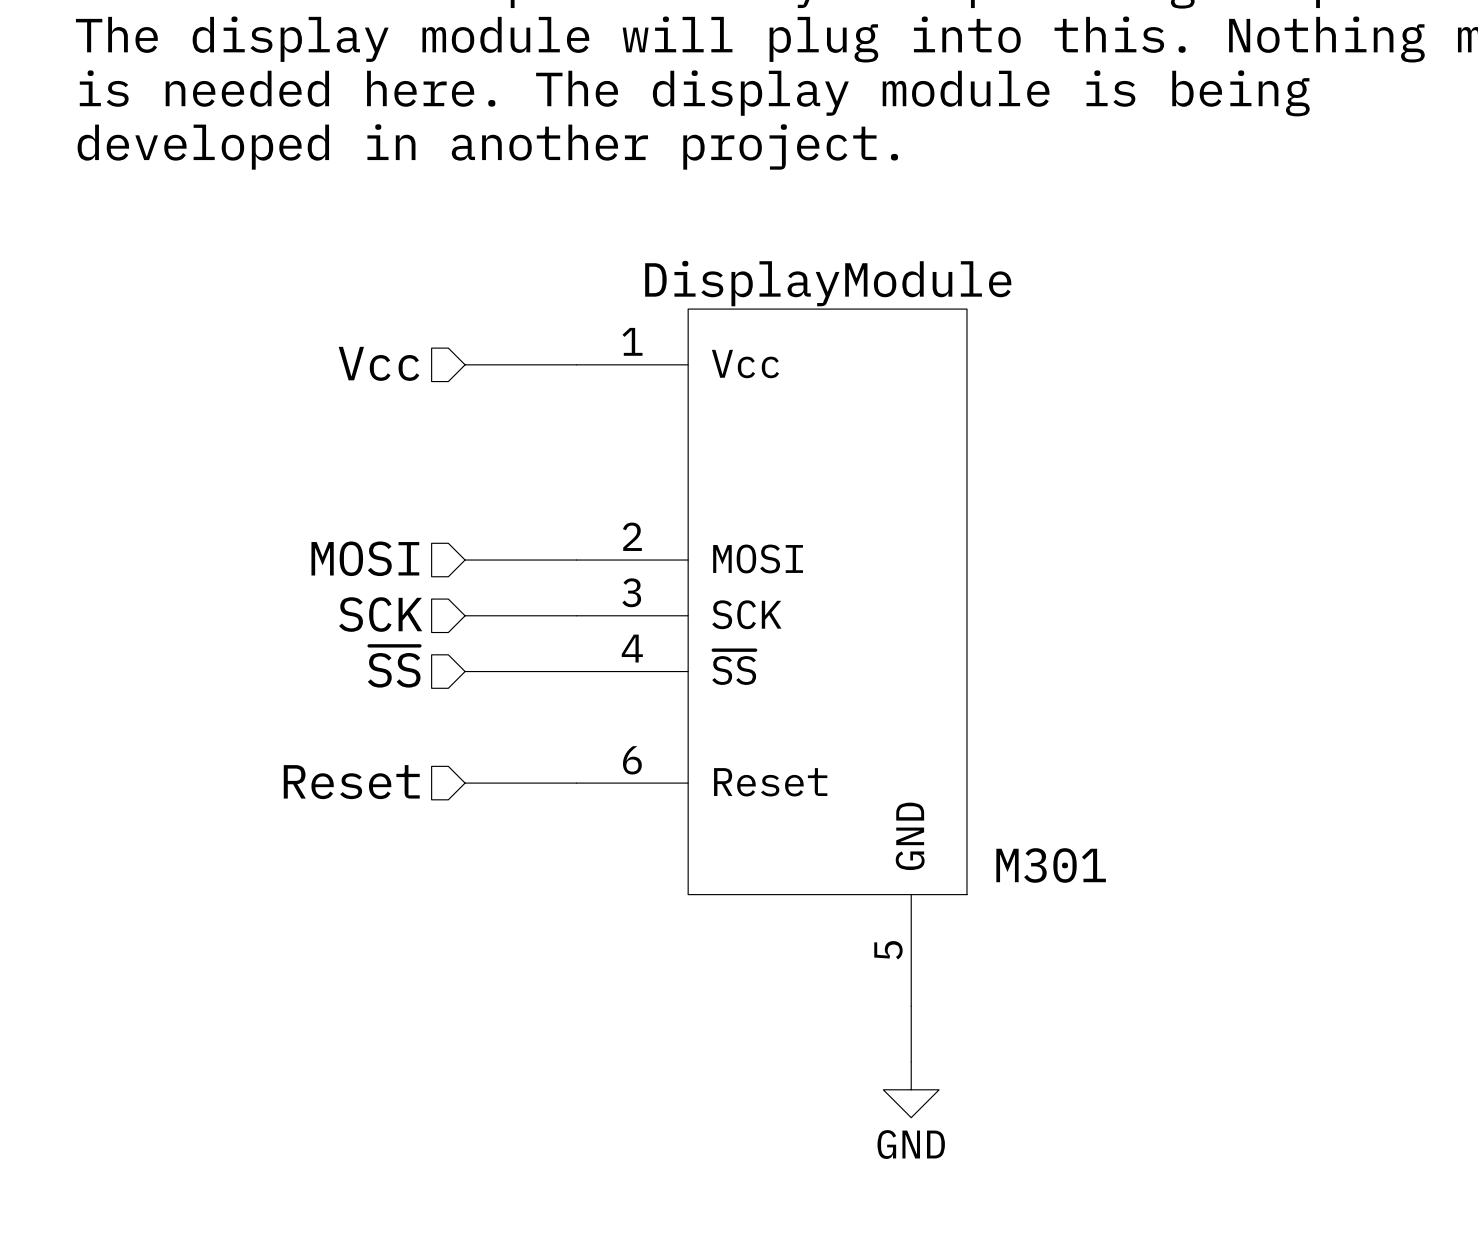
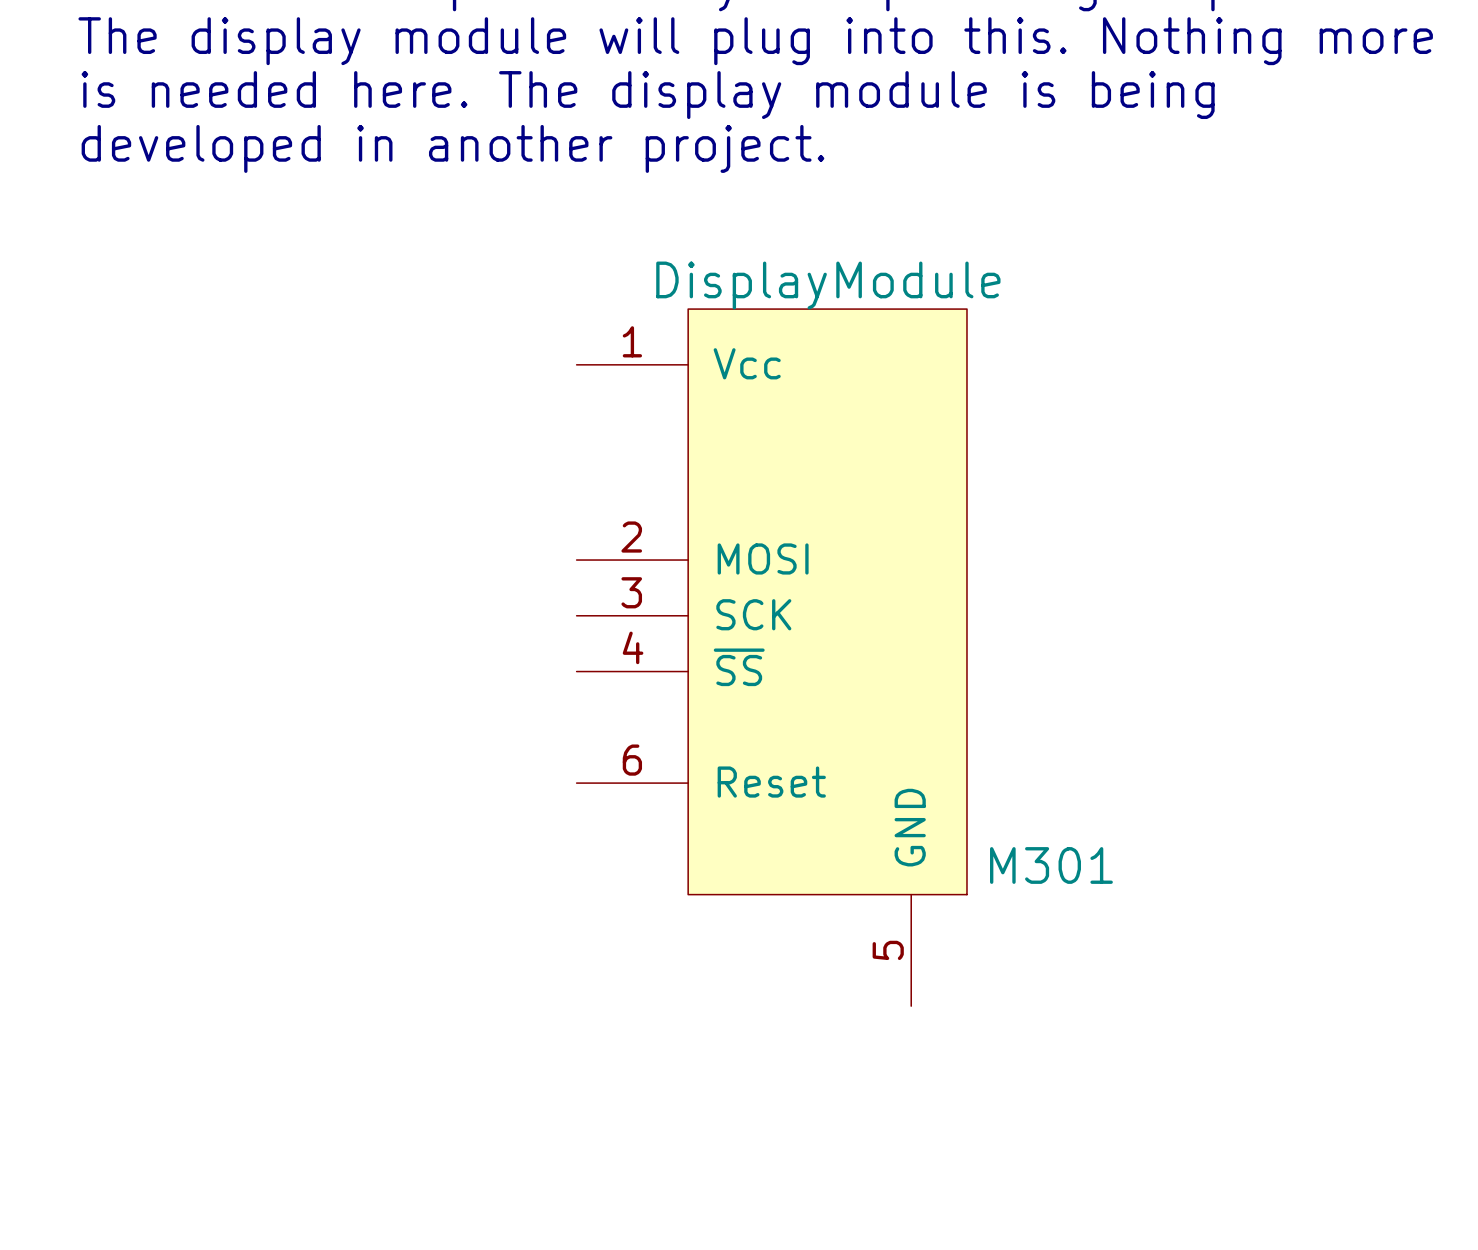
hierarchical label: Vcc (378, 363) -> none
wire: (465, 364) (576, 364) -> none
hierarchical label: MOSI (365, 558) -> none
wire: (465, 560) (576, 560) -> none
hierarchical label: SCK (380, 614) -> none
wire: (465, 615) (576, 615) -> none
hierarchical label: ~{SS} (394, 666) -> none
wire: (465, 671) (576, 671) -> none
hierarchical label: Reset (351, 782) -> none
wire: (465, 783) (576, 783) -> none
wire: (911, 1006) (911, 1061) -> none
power symbol: GND (911, 1089) -> none

